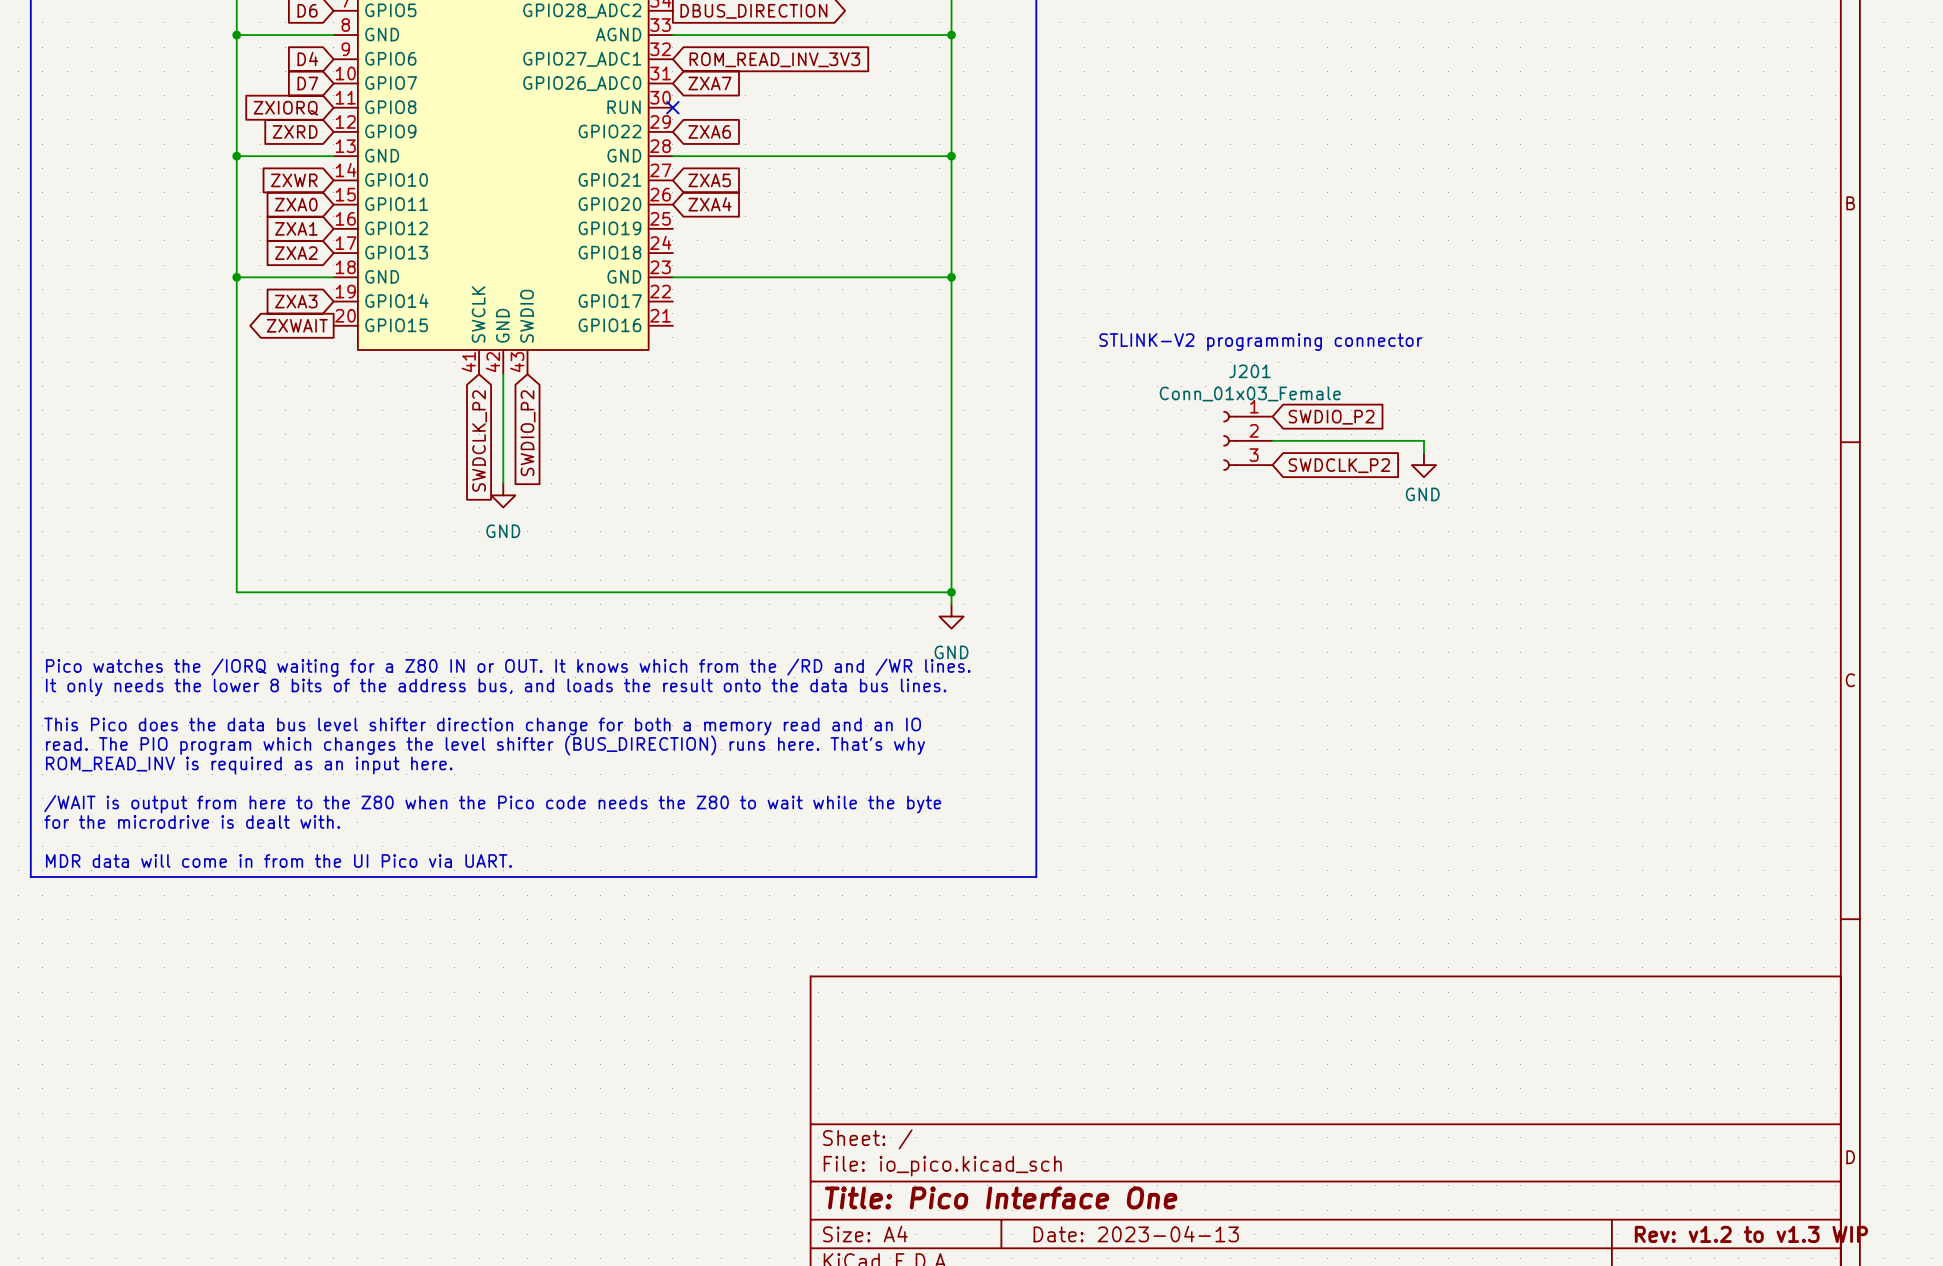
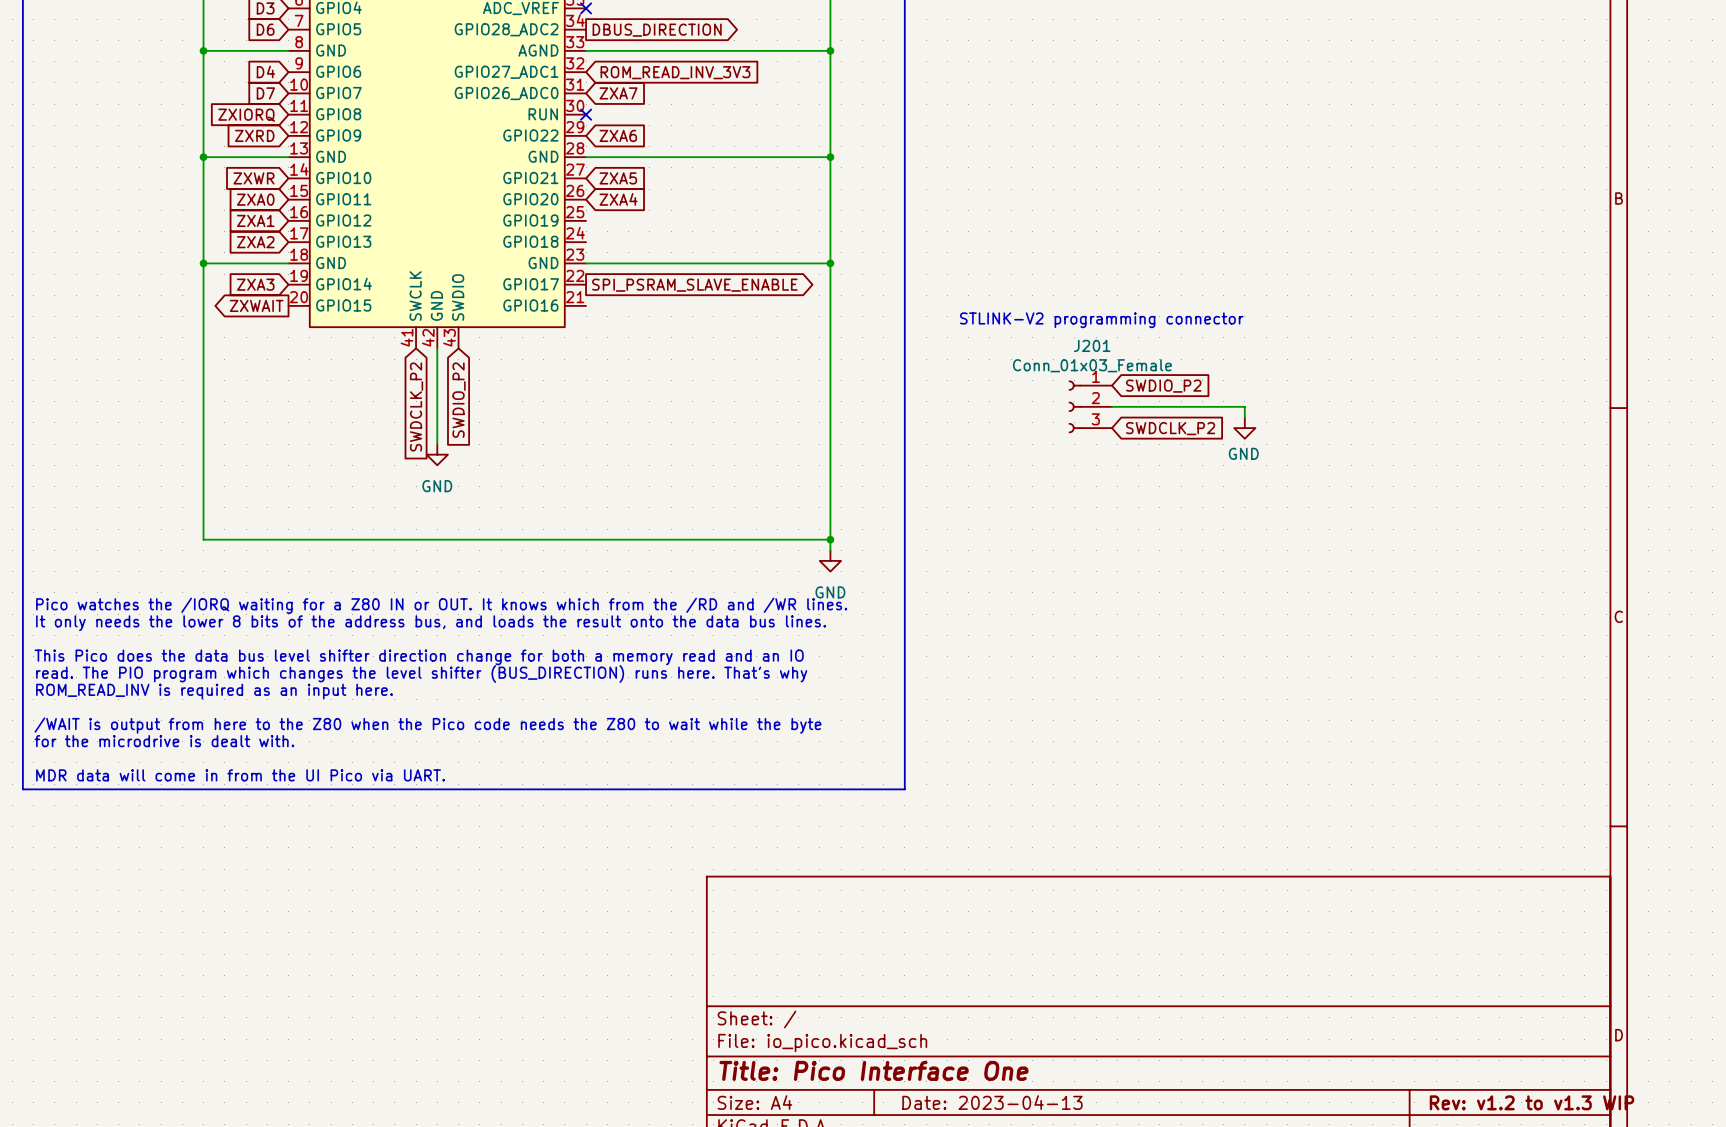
global label: none -> SPI_PSRAM_SLAVE_ENABLE (694, 285)

